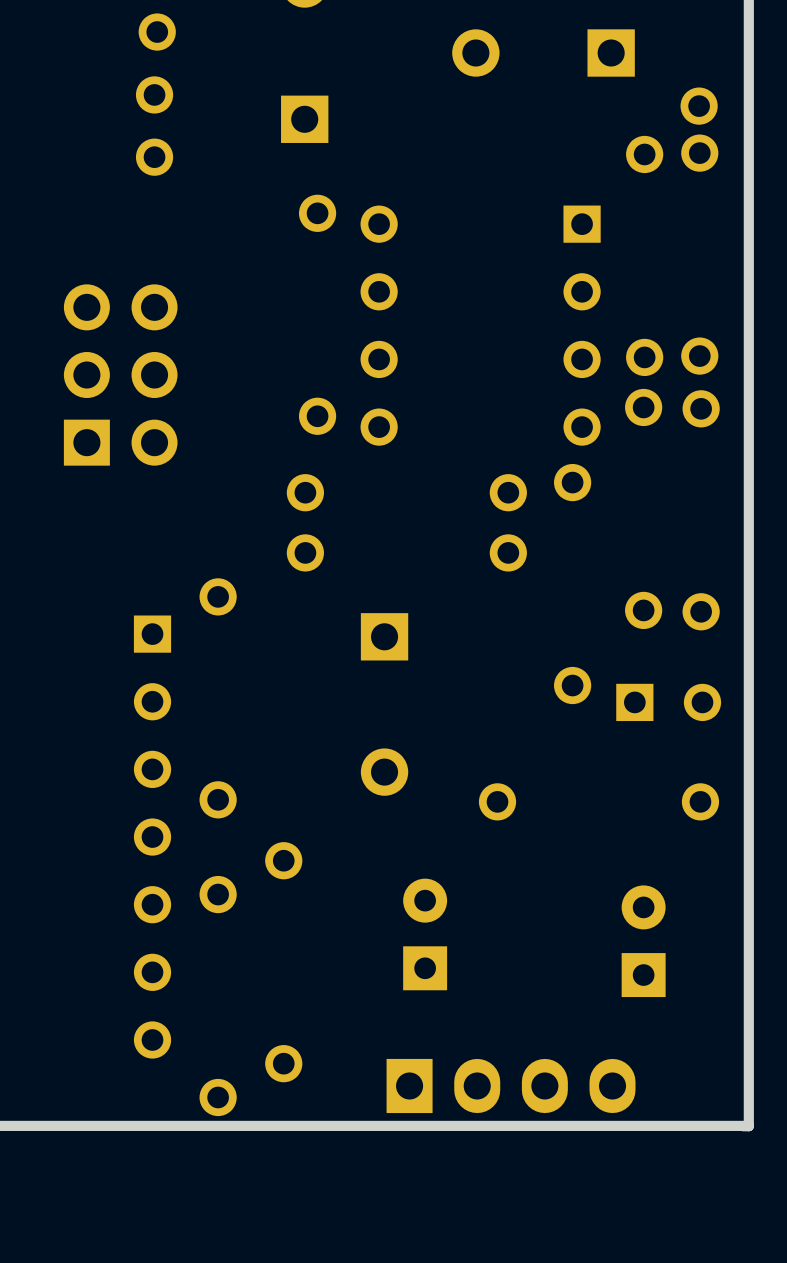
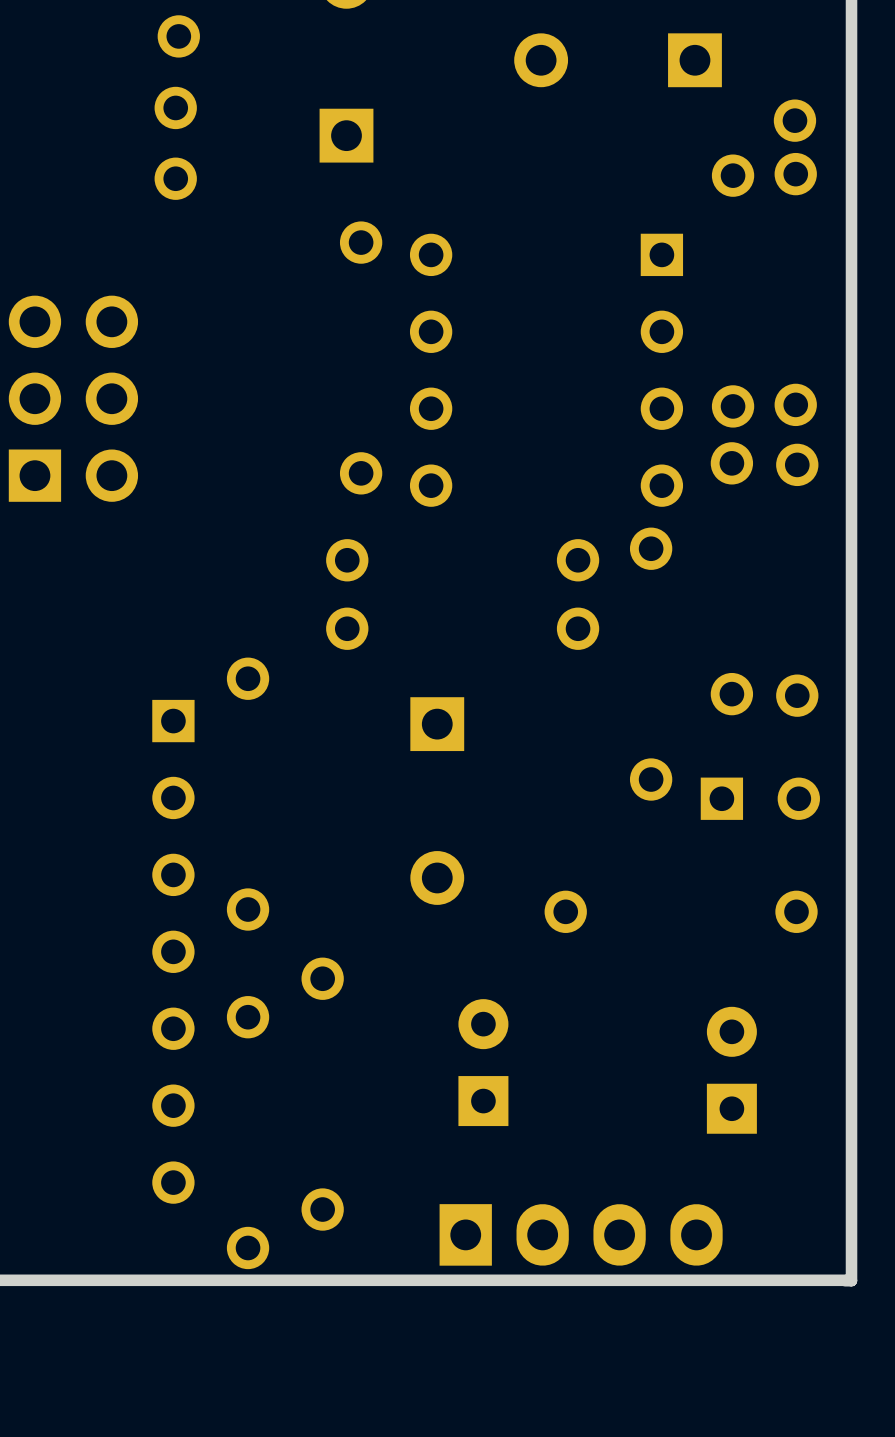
part position: (120, 375) -> (73, 398)

